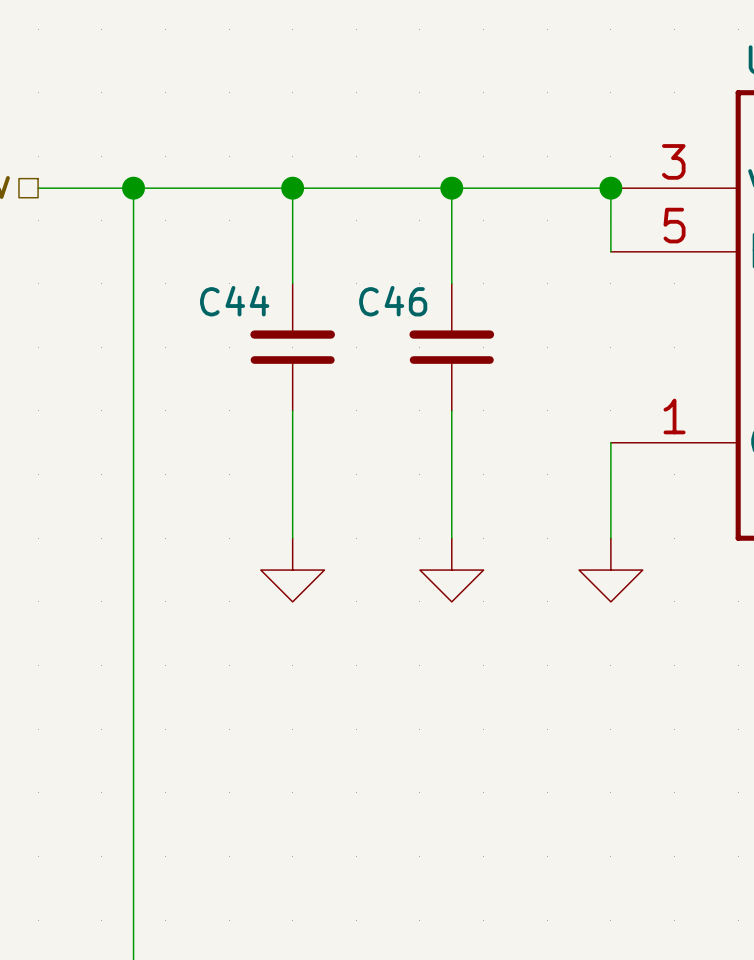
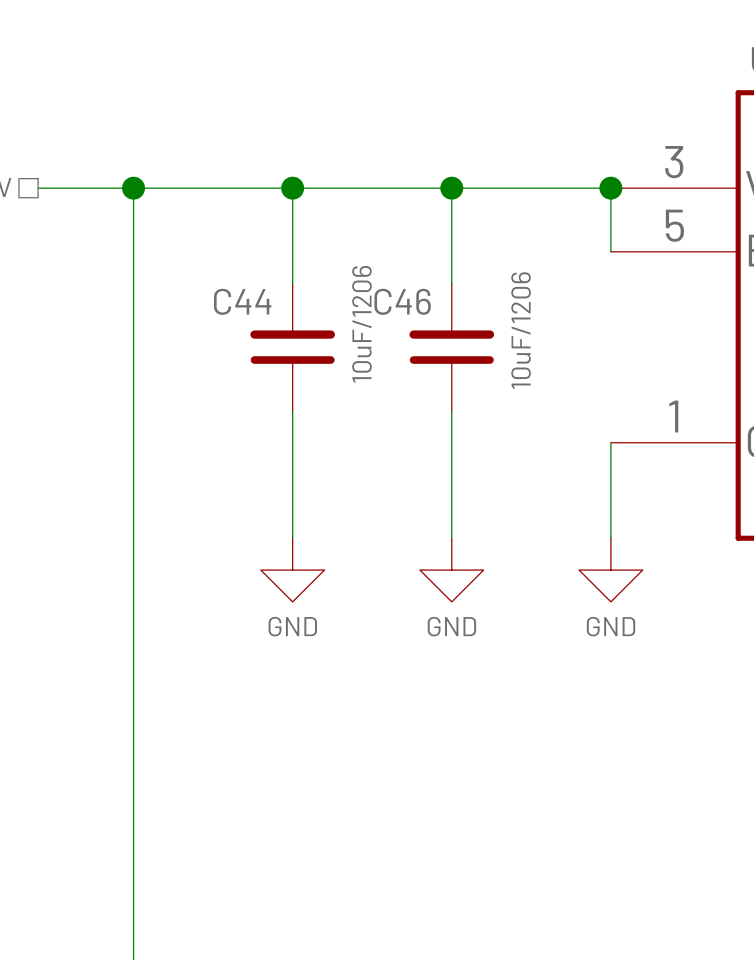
C44 value: none -> 10uF/1206 (361, 324)
C46 value: none -> 10uF/1206 (521, 330)
power symbol text: none -> GND (292, 626)
power symbol text: none -> GND (451, 626)
power symbol text: none -> GND (611, 626)

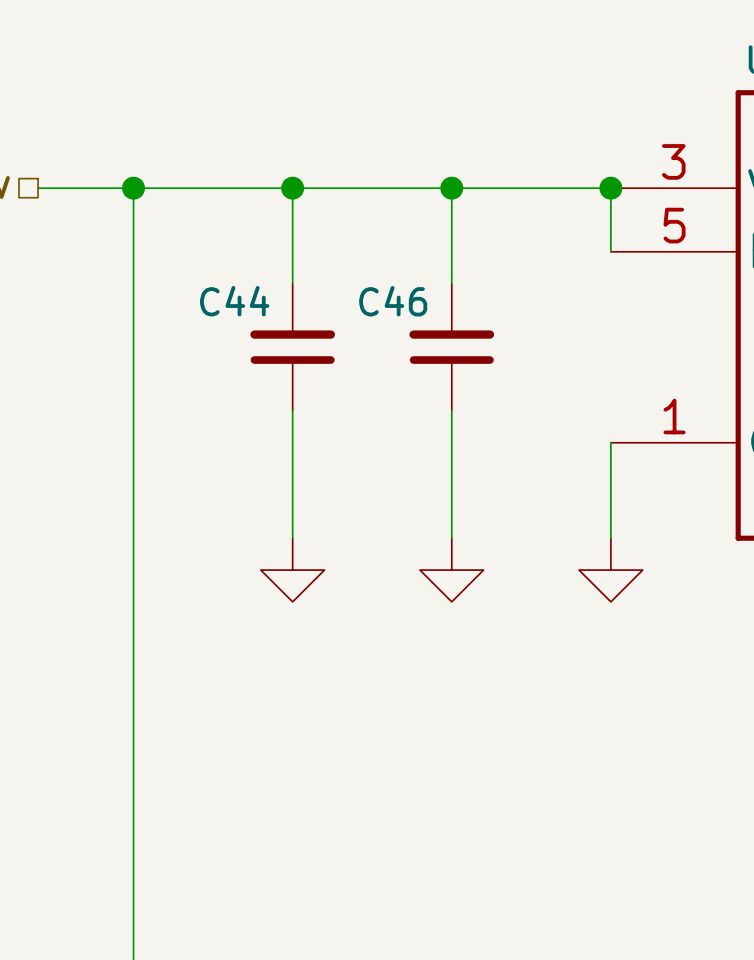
C44 value: 10uF/1206 (361, 324) -> none
C46 value: 10uF/1206 (521, 330) -> none
power symbol text: GND (292, 626) -> none
power symbol text: GND (451, 626) -> none
power symbol text: GND (611, 626) -> none

